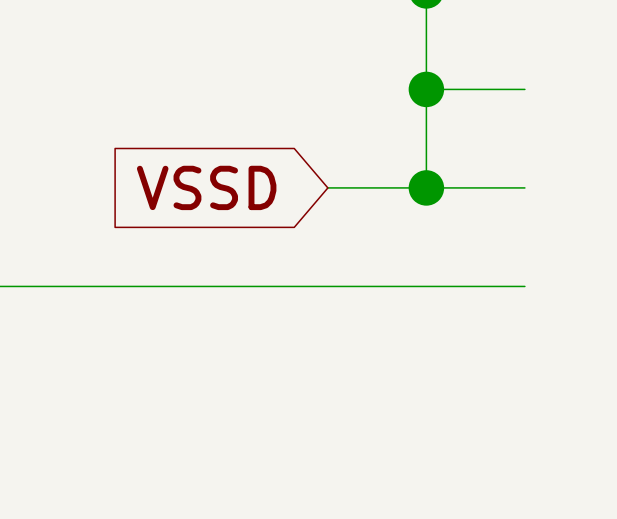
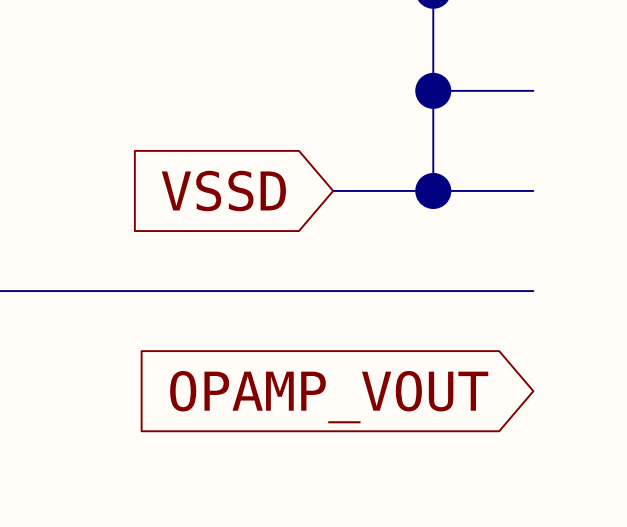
global label: none -> OPAMP_VOUT (329, 397)

